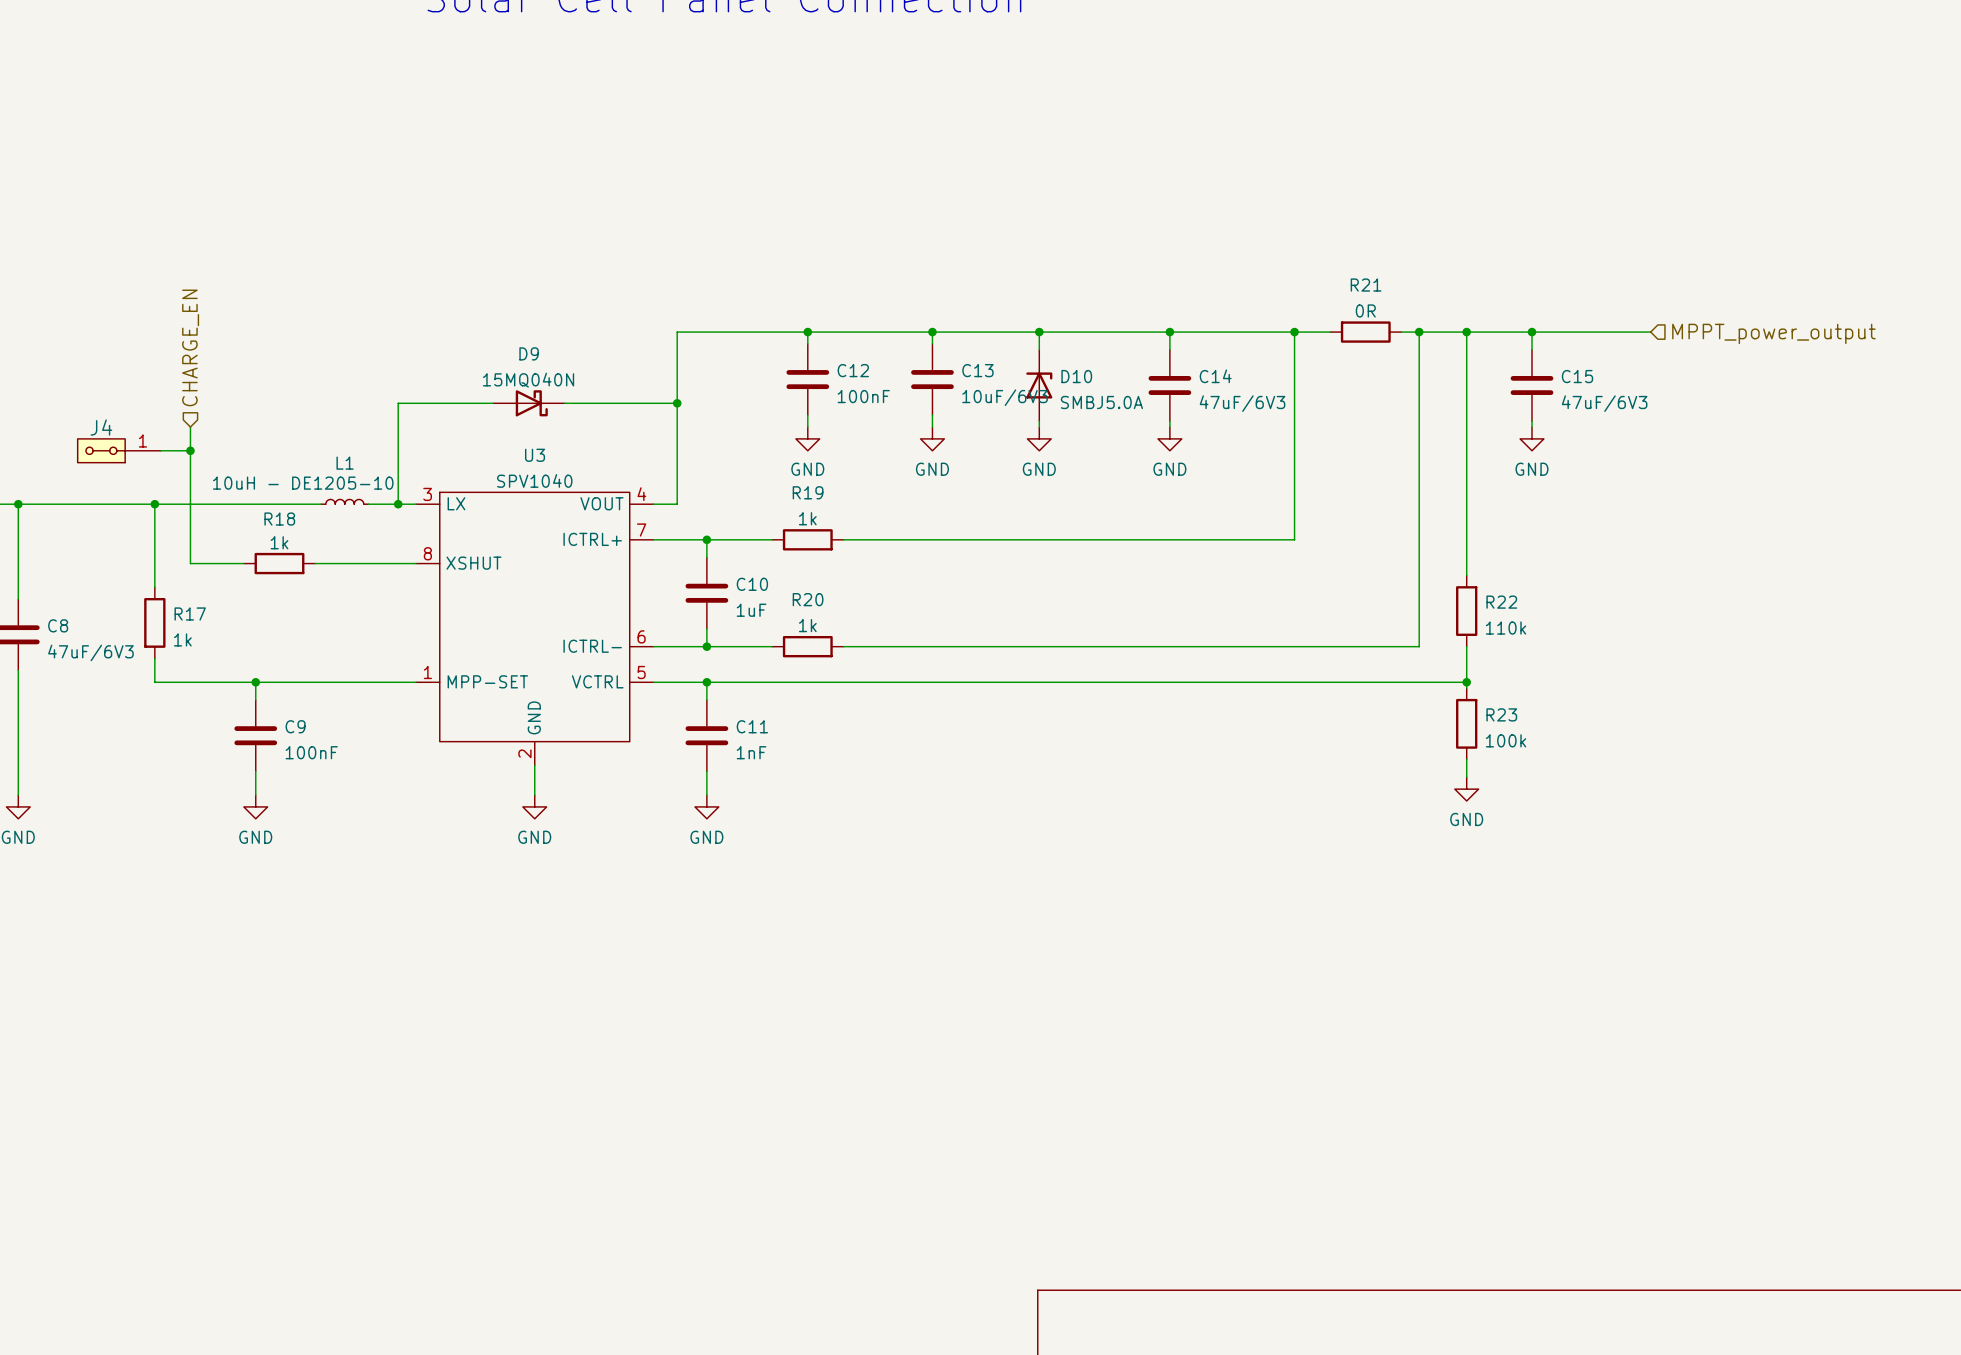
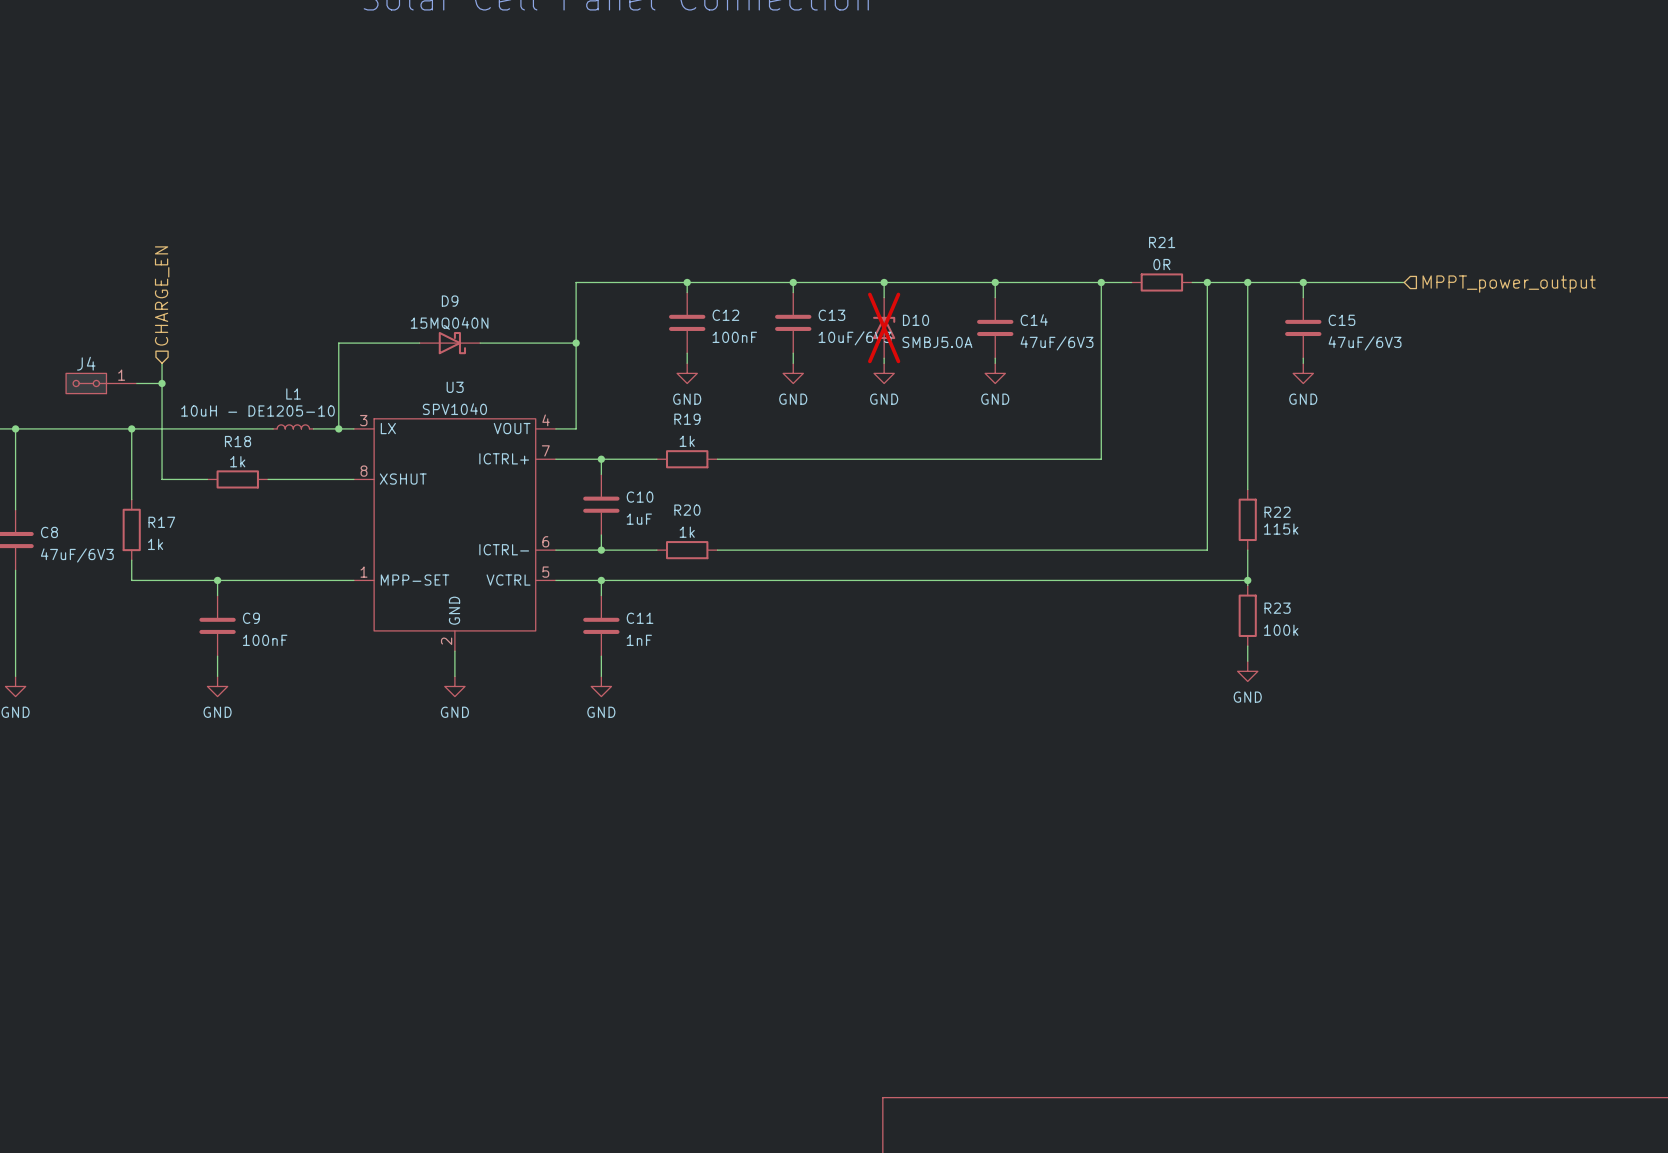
D10 do-not-place cross: none -> (884, 327)
R22 value: 110k (1506, 628) -> 115k (1281, 529)

